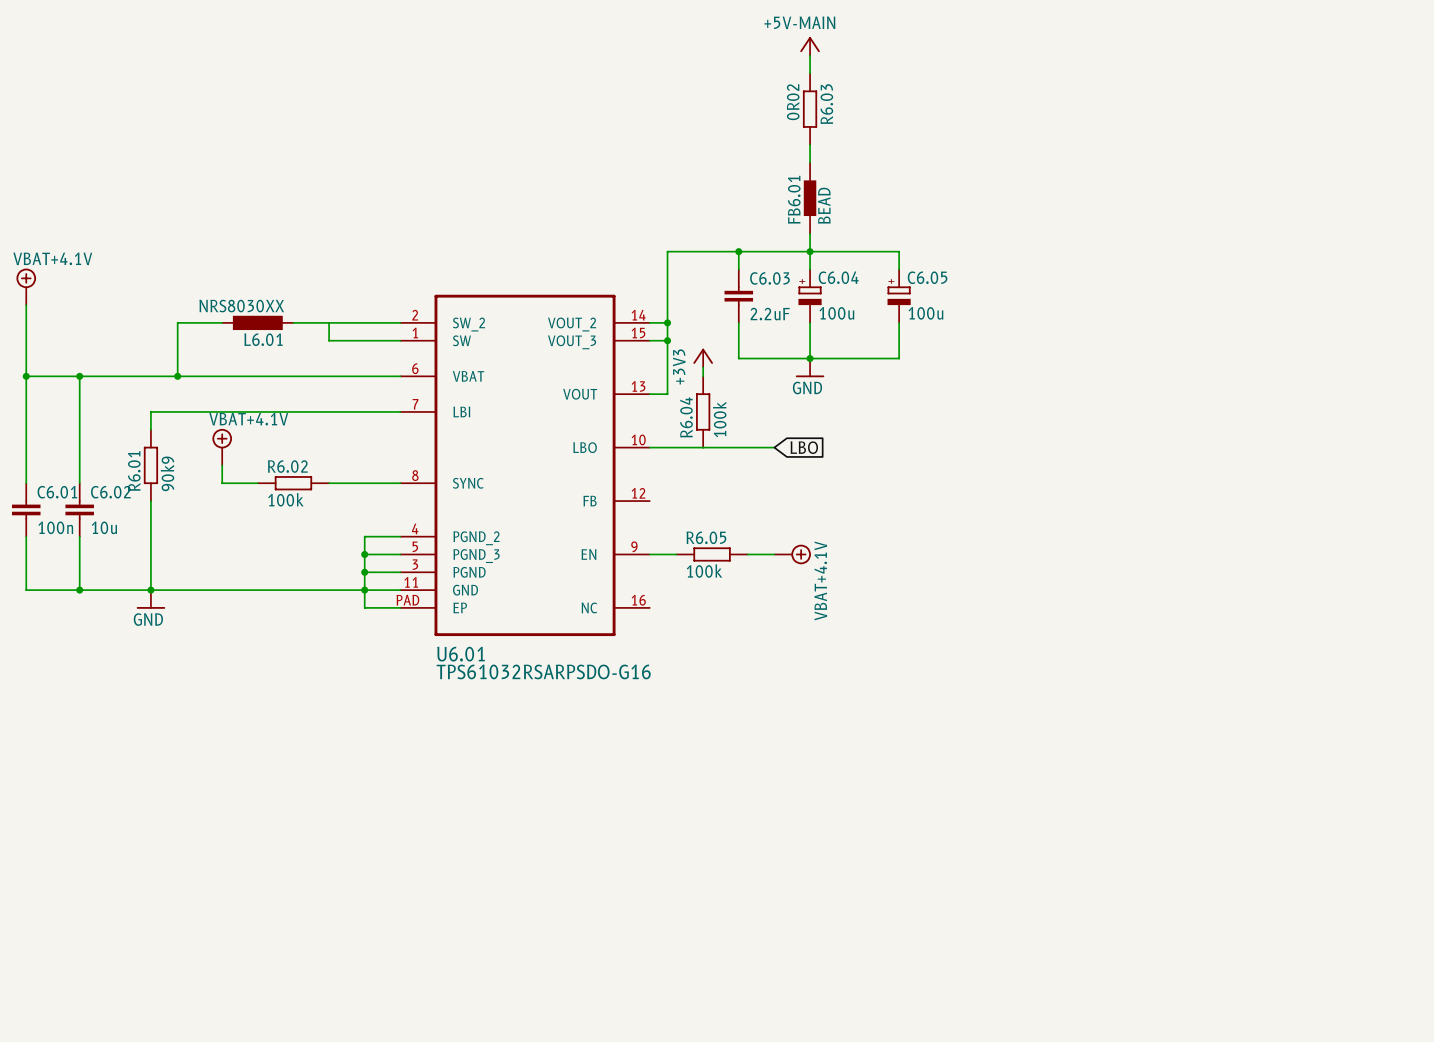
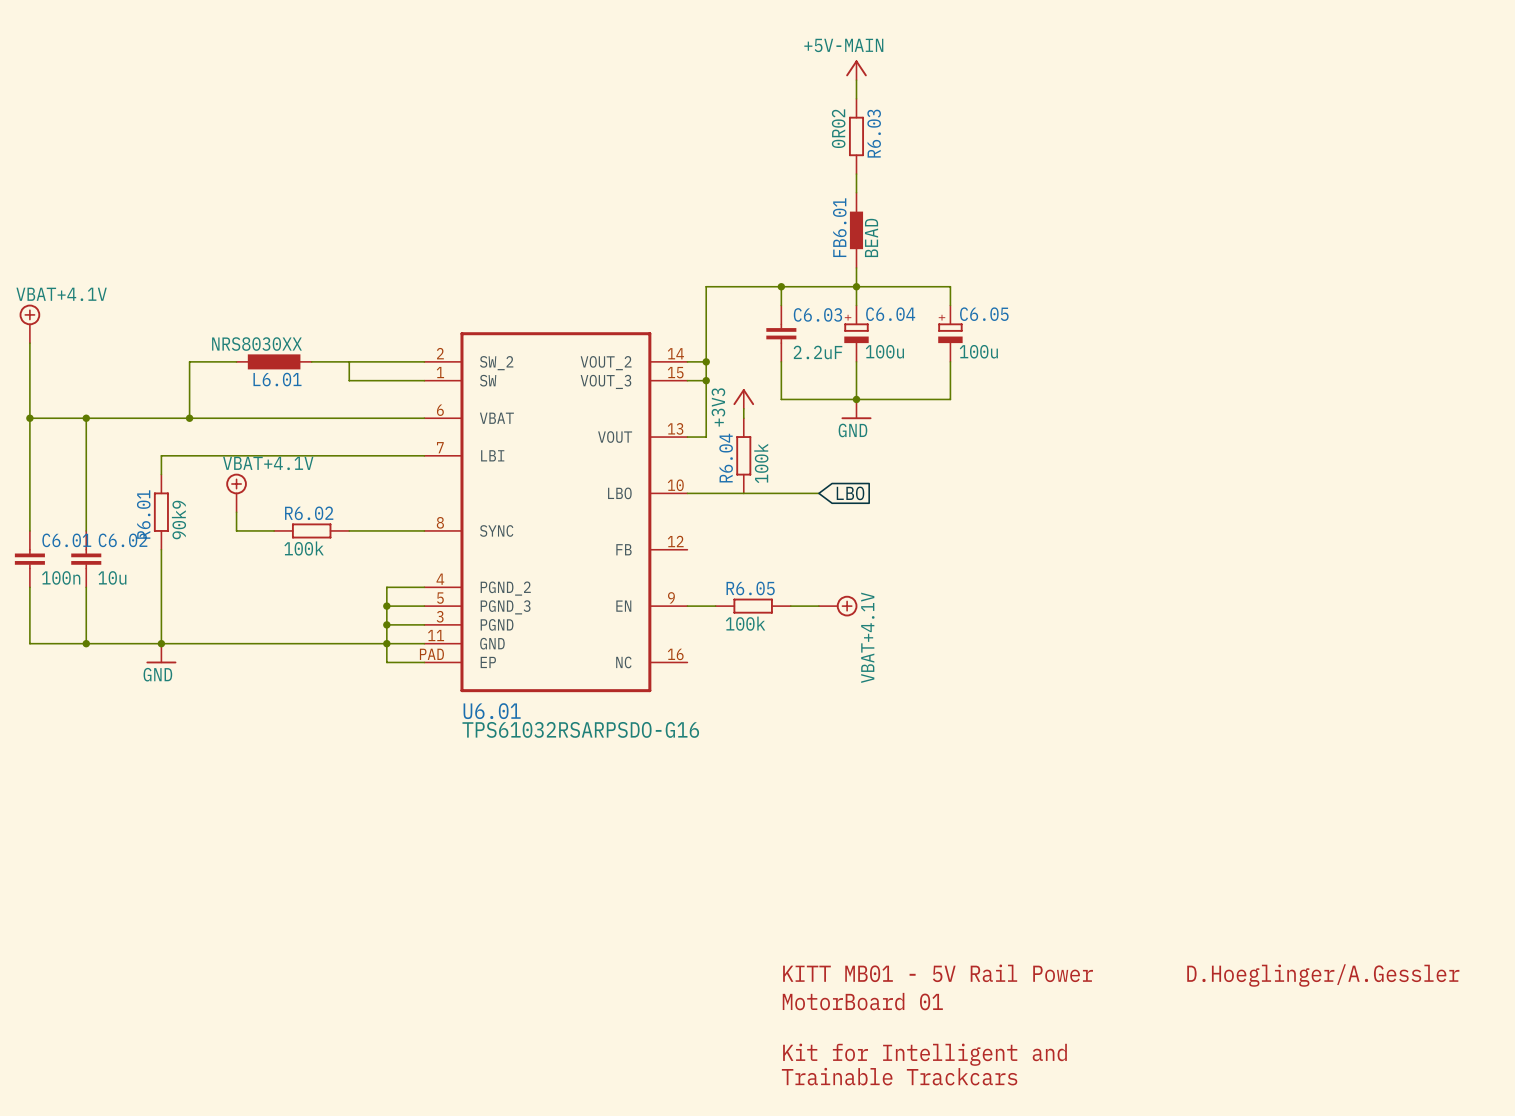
text: none -> KITT MB01 - 5V Rail Power (938, 973)
text: none -> D.Hoeglinger/A.Gessler (1323, 975)
text: none -> MotorBoard 01 (862, 1001)
text: none -> Kit for Intelligent and (924, 1054)
text: none -> Trainable Trackcars (899, 1076)

